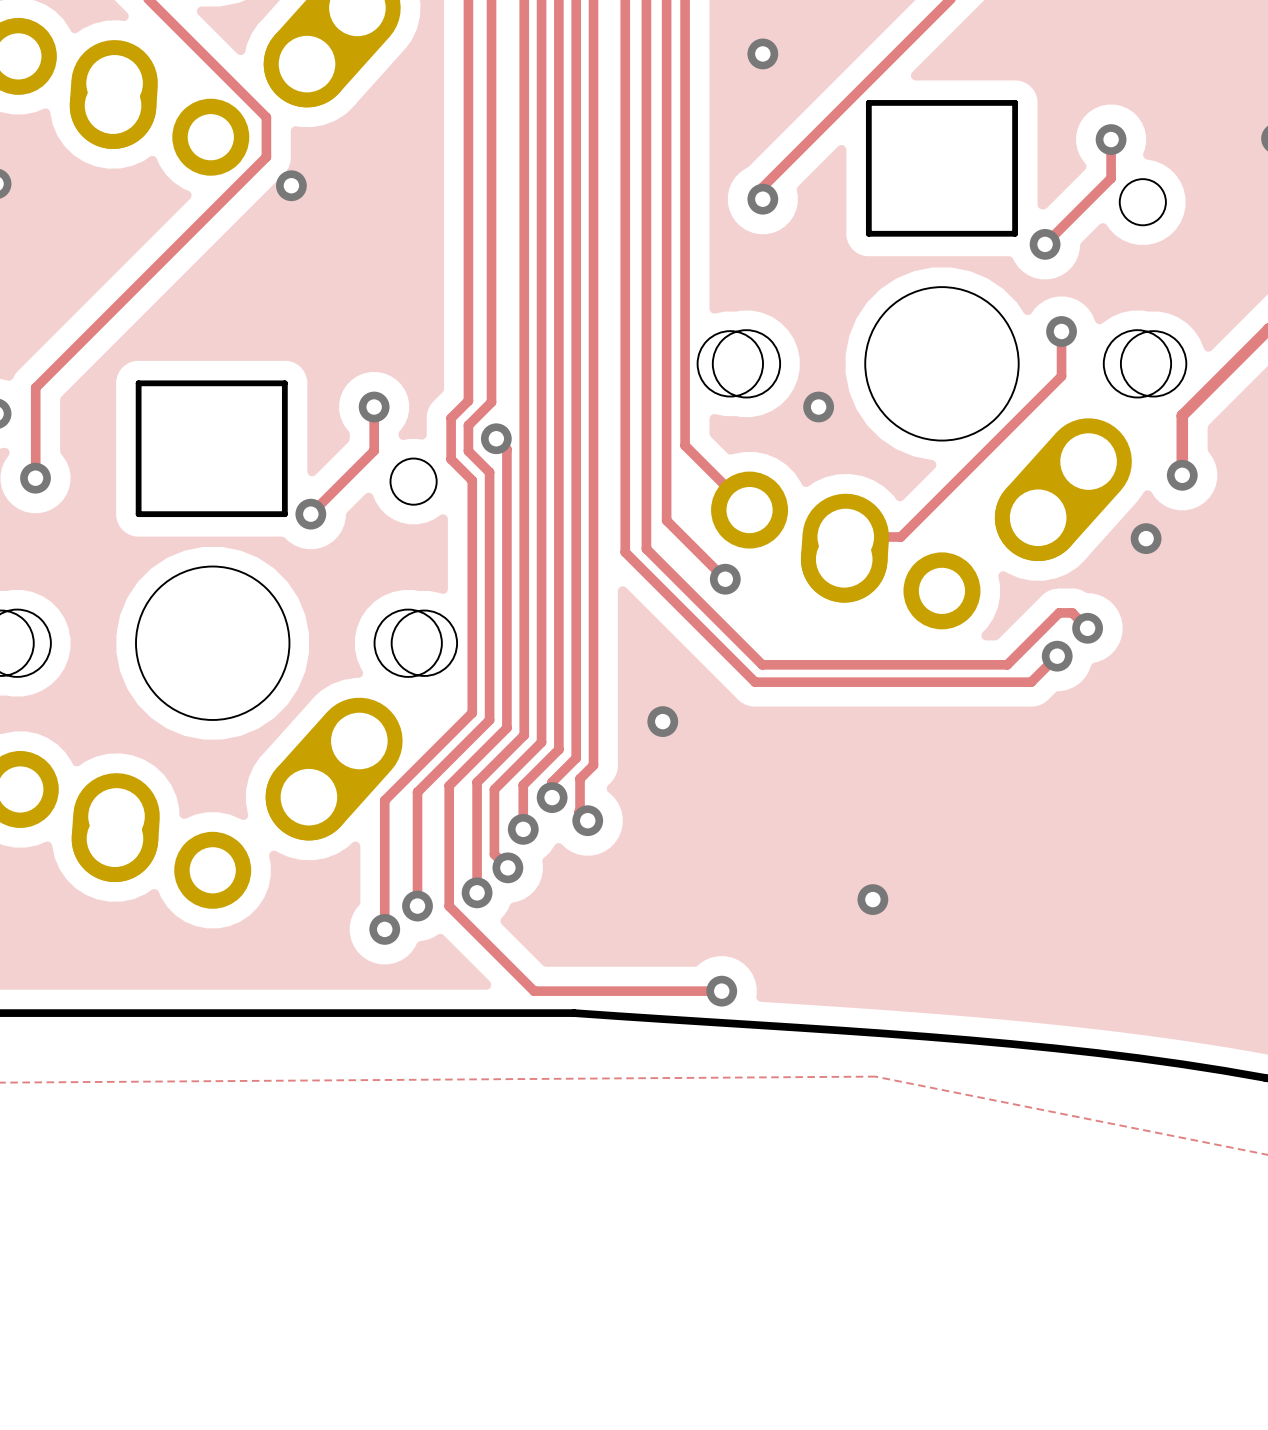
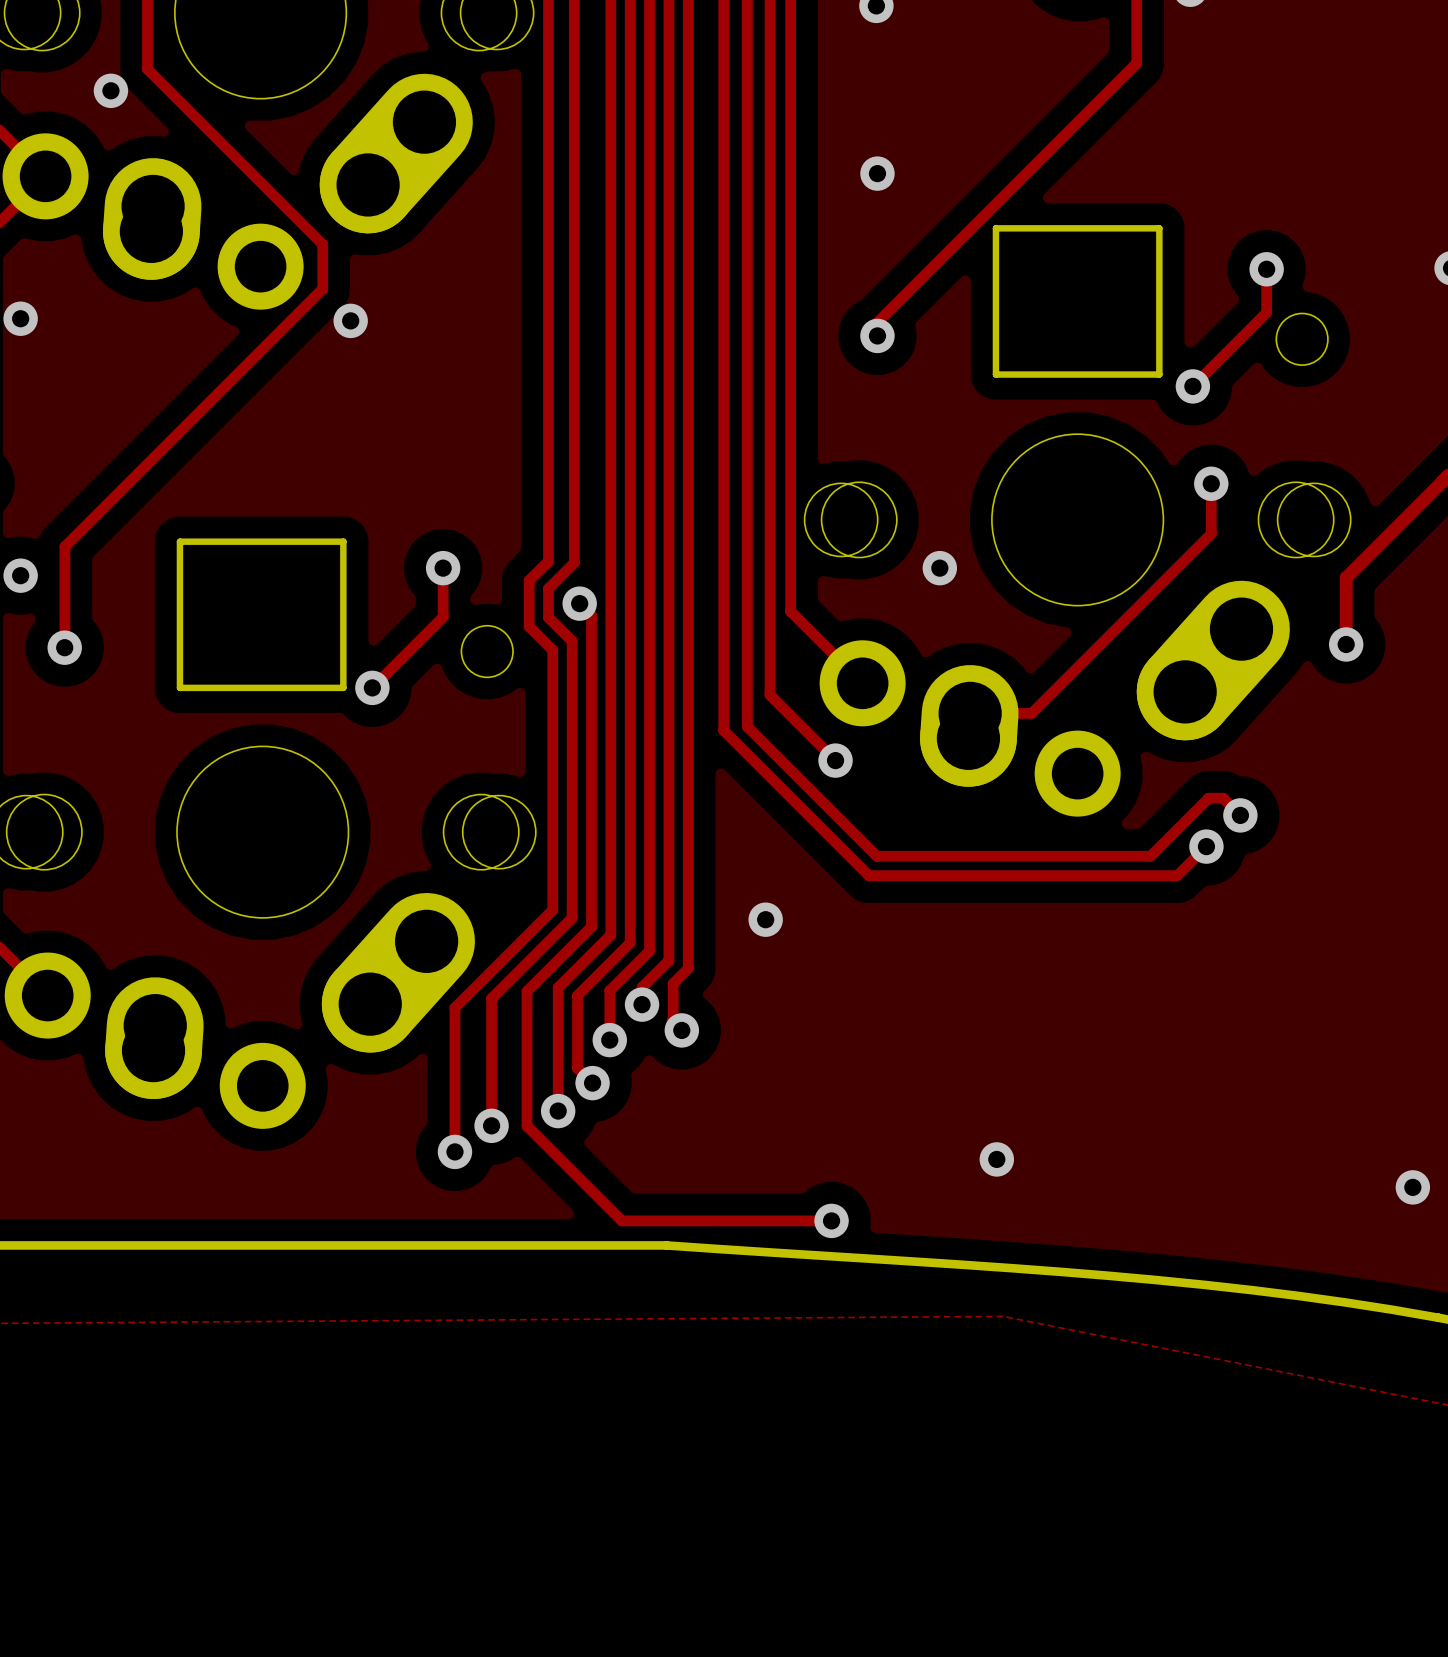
via: (1146, 538) -> none
via position: (872, 899) -> (996, 1159)
via: none -> (1412, 1187)

